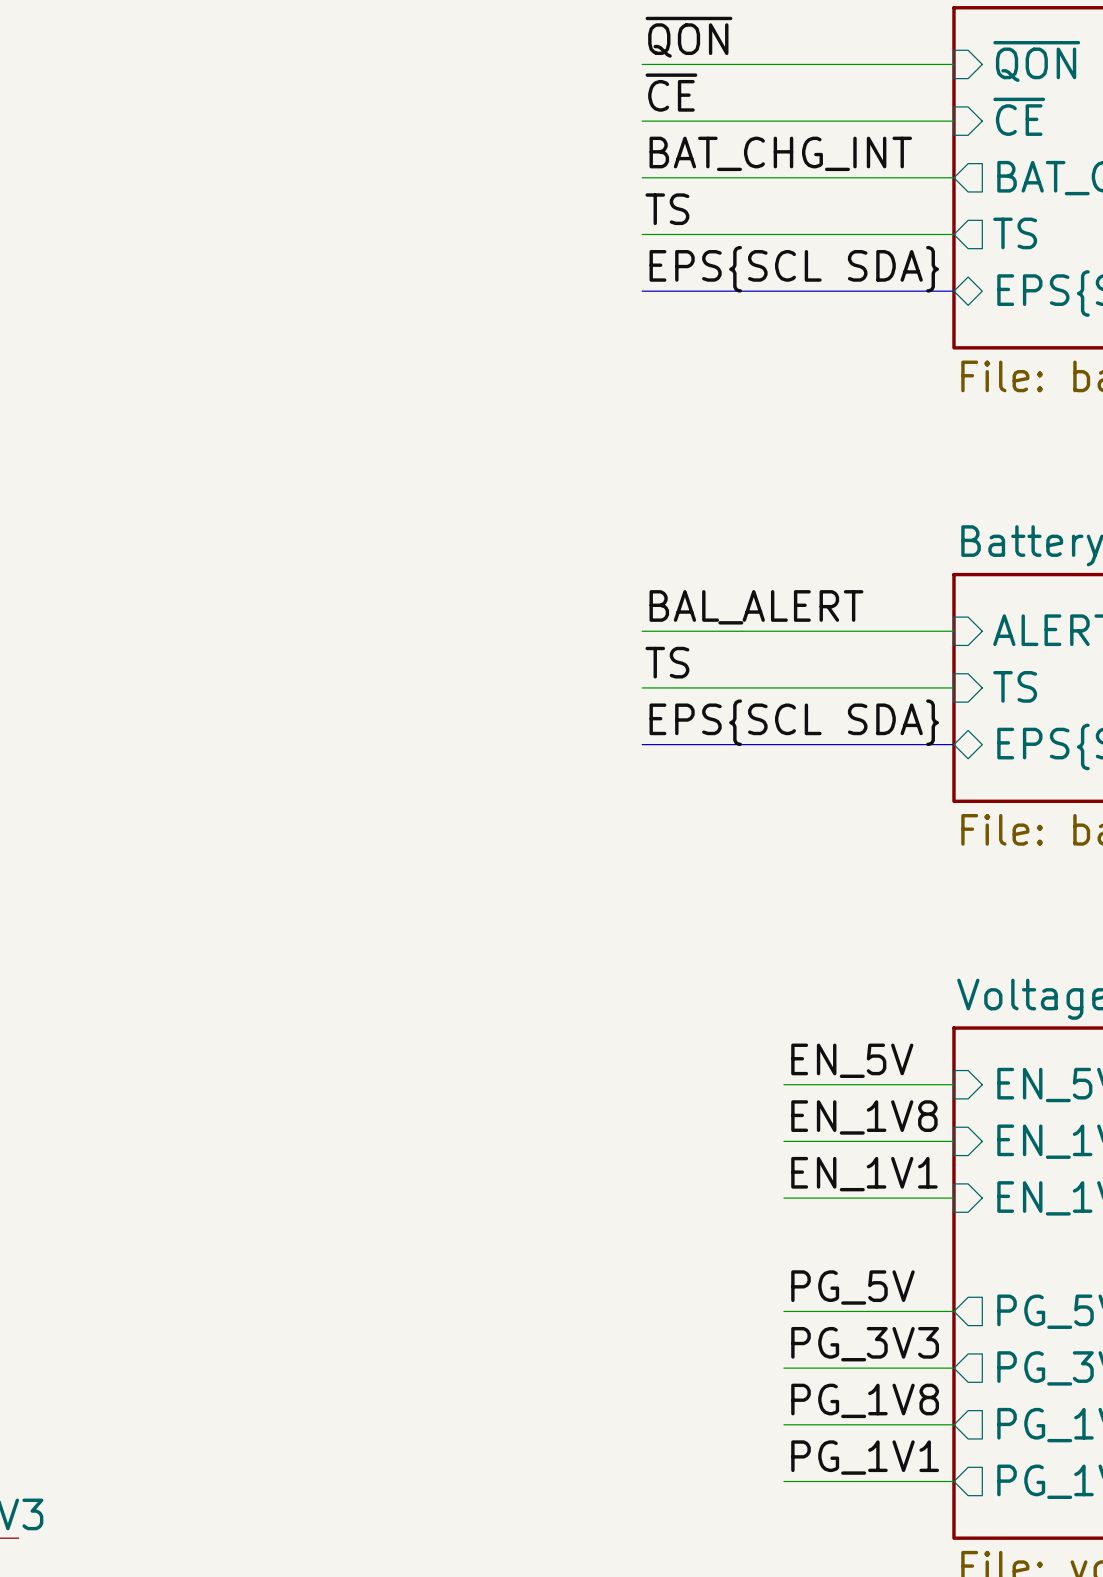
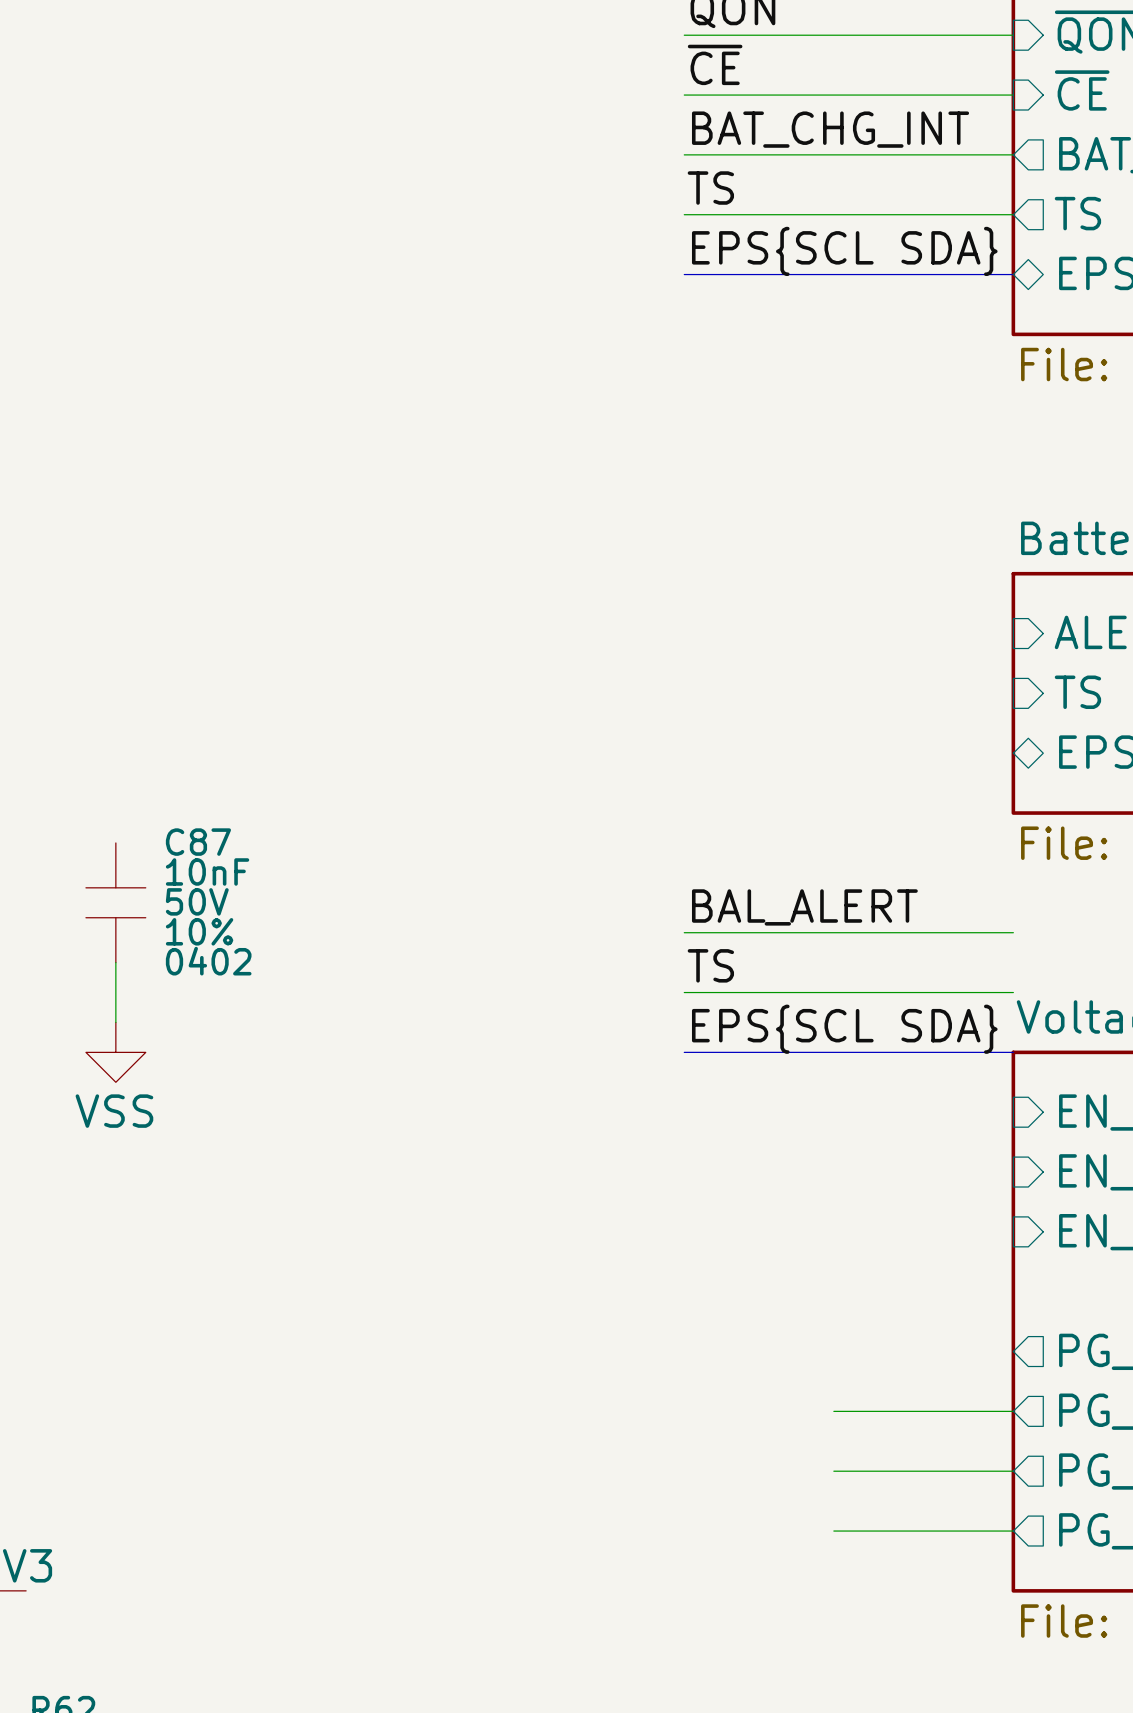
label position: BAL_ALERT (756, 607) -> BAL_ALERT (804, 907)
wire: (642, 631) (953, 631) -> (684, 932) (1013, 932)
label position: TS (667, 662) -> TS (710, 965)
wire: (642, 687) (953, 687) -> (684, 992) (1013, 992)
label position: EPS{SCL SDA} (794, 722) -> EPS{SCL SDA} (844, 1029)
bus: (642, 744) (953, 744) -> (684, 1052) (1013, 1052)
C87: none -> 10nF (115, 902)
wire: none -> (115, 962) (115, 1022)
power symbol: none -> VSS (115, 1052)
label: EN_5V (852, 1060) -> none
wire: (783, 1084) (953, 1084) -> none
label: EN_1V8 (864, 1117) -> none
wire: (783, 1141) (953, 1141) -> none
label: EN_1V1 (864, 1174) -> none
wire: (783, 1198) (953, 1198) -> none
label: PG_5V (852, 1287) -> none
wire: (783, 1311) (953, 1311) -> none
label: PG_3V3 (865, 1344) -> none
label: PG_1V8 (865, 1400) -> none
label: PG_1V1 (865, 1457) -> none

